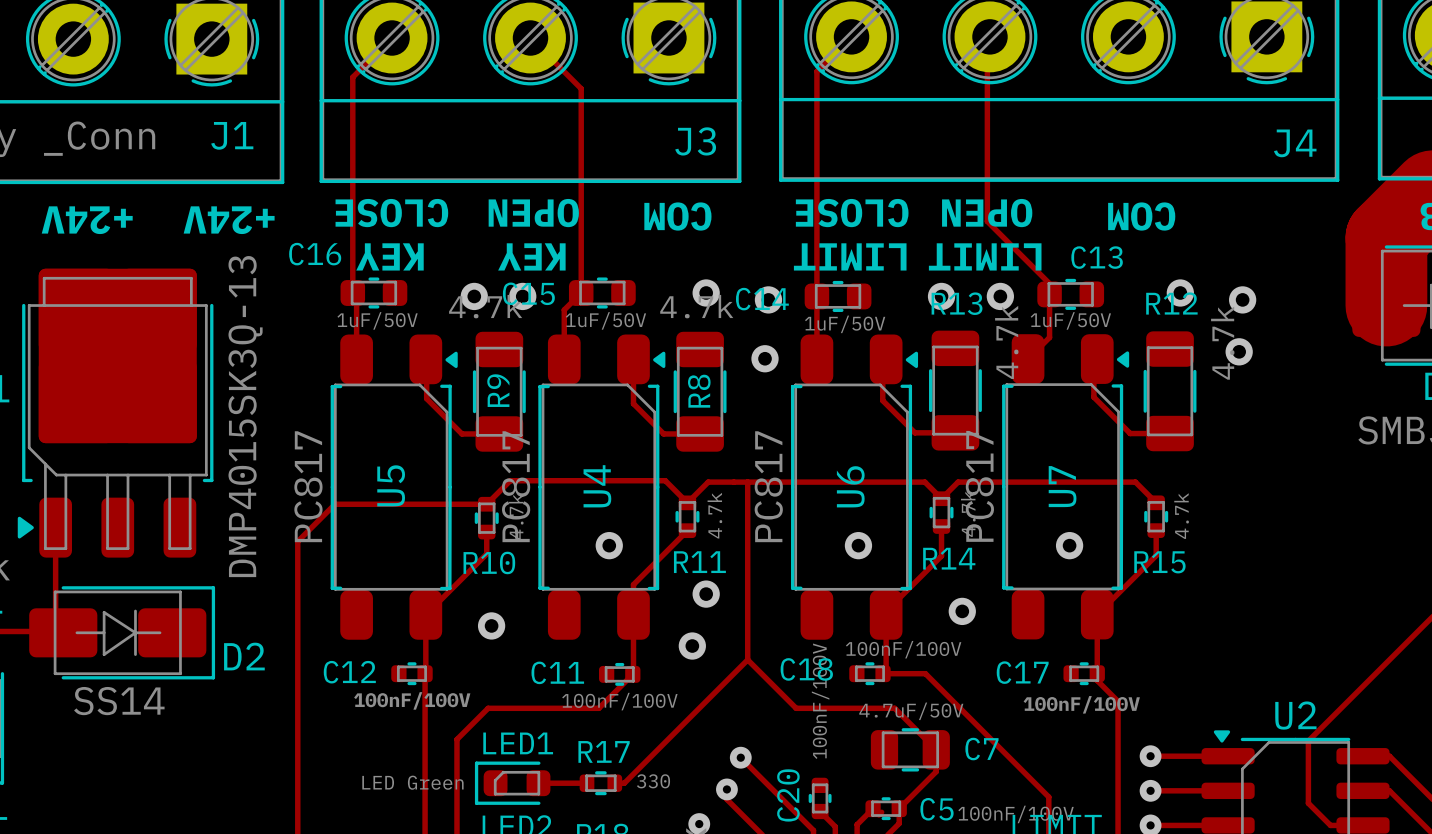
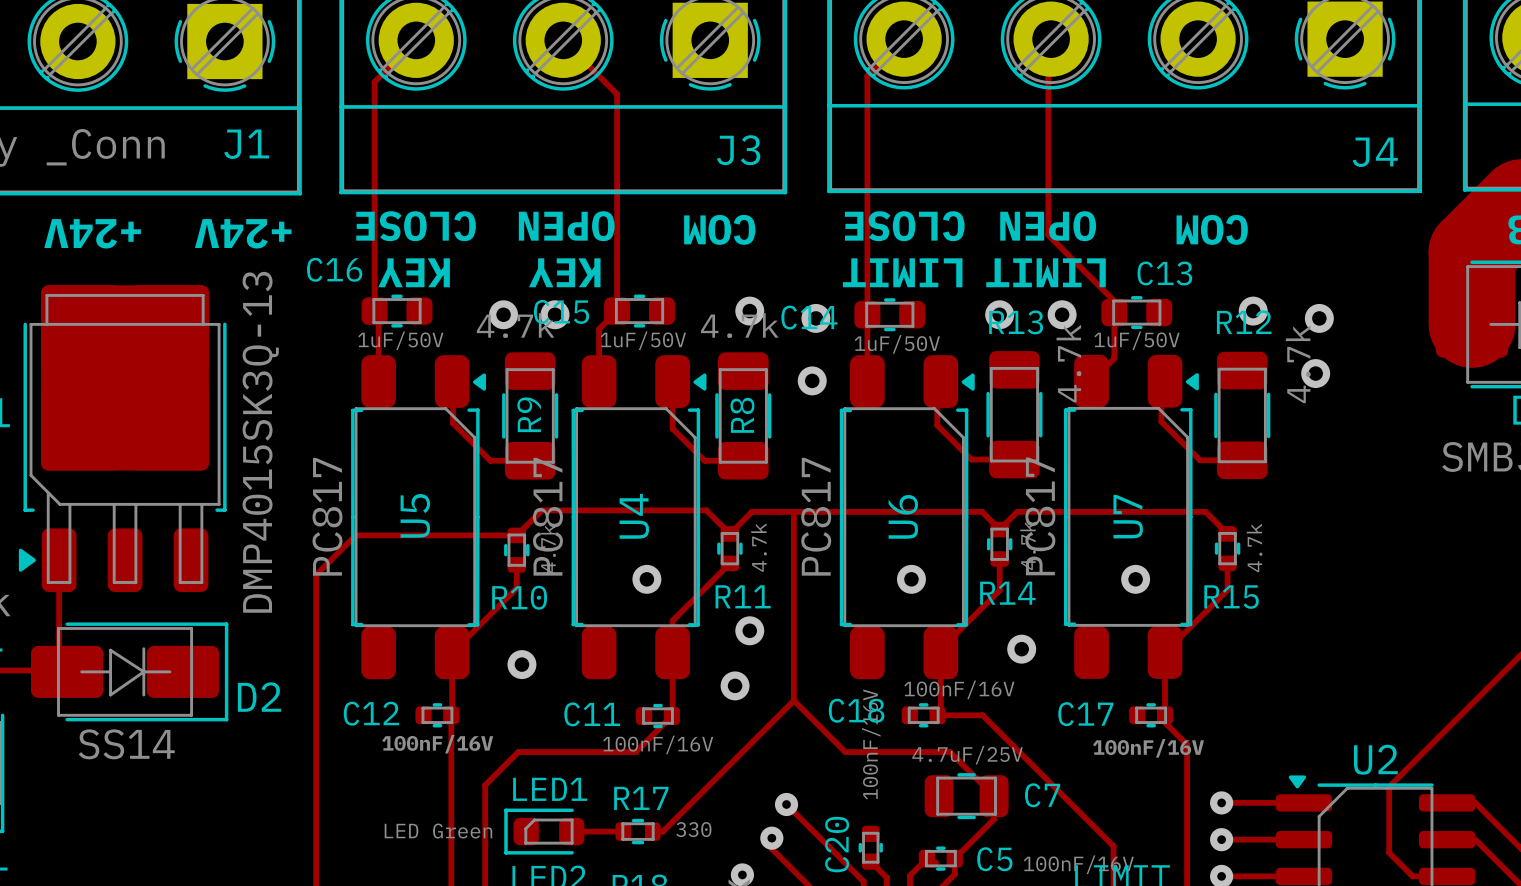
C18 value: 100nF/100V (903, 649) -> 100nF/16V (959, 689)
C12 value: 100nF/100V (412, 700) -> 100nF/16V (437, 744)
C11 value: 100nF/100V (619, 701) -> 100nF/16V (658, 744)
C20 value: 100nF/100V (820, 701) -> 100nF/16V (871, 744)
C17 value: 100nF/100V (1081, 704) -> 100nF/16V (1148, 748)
C7 value: 4.7uF/50V (911, 711) -> 4.7uF/25V (967, 755)
C5 value: 100nF/100V (1016, 814) -> 100nF/16V (1078, 864)

